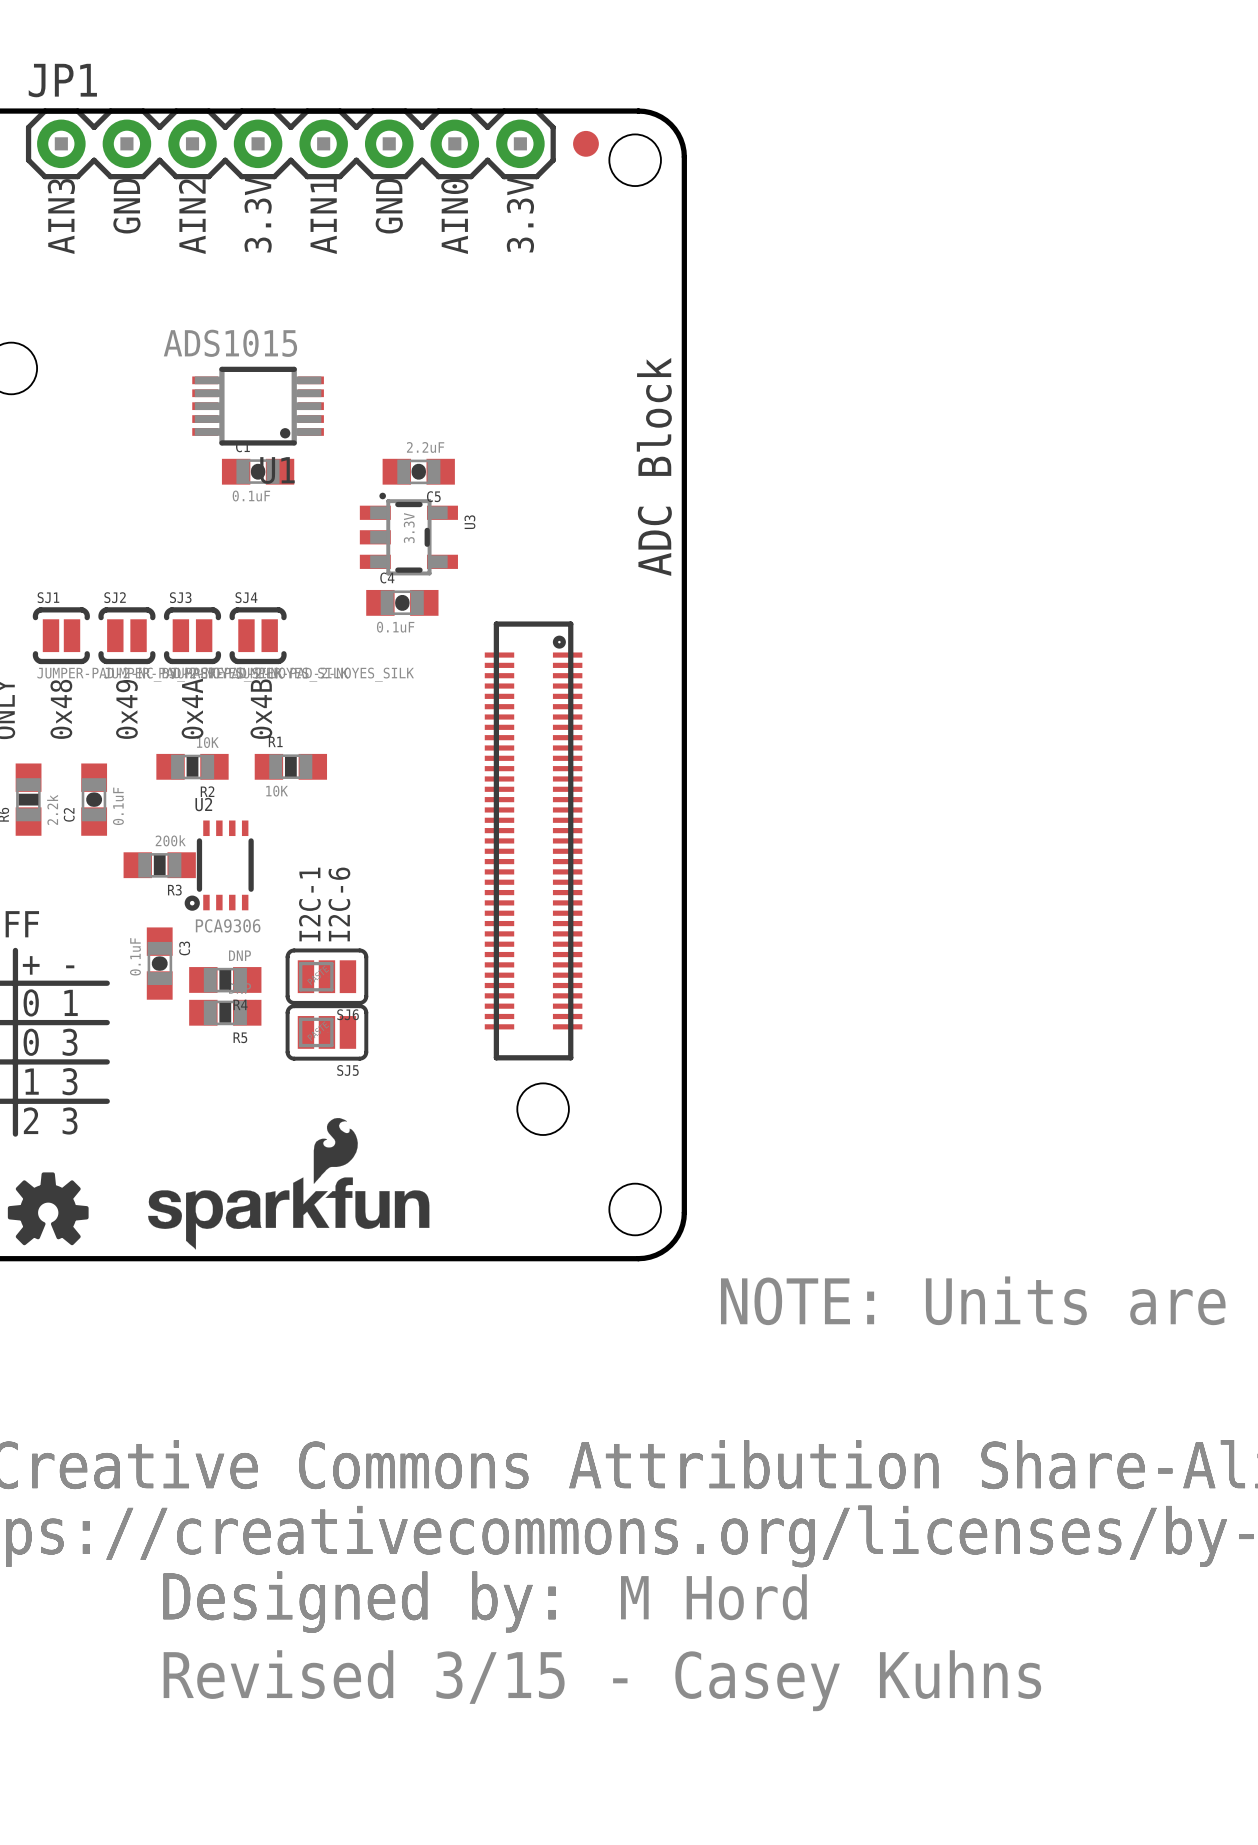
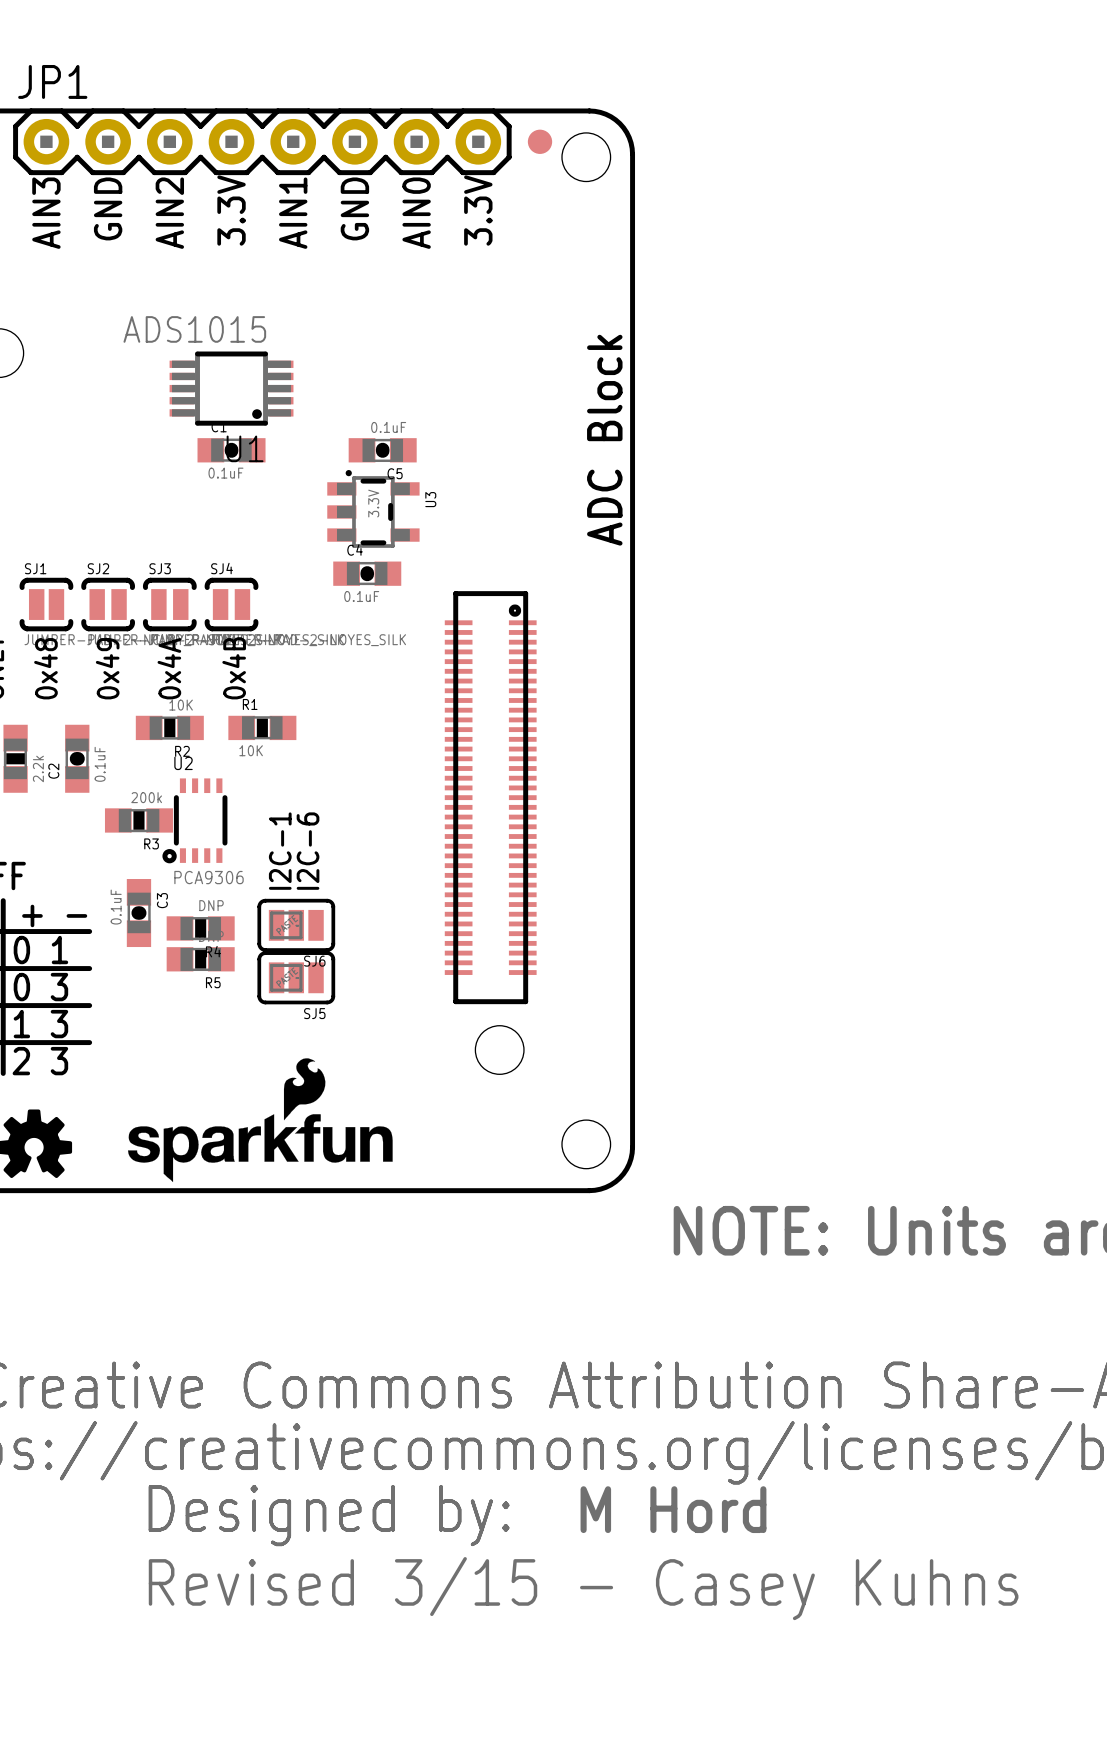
C5 value: 2.2uF (425, 447) -> 0.1uF (388, 427)

